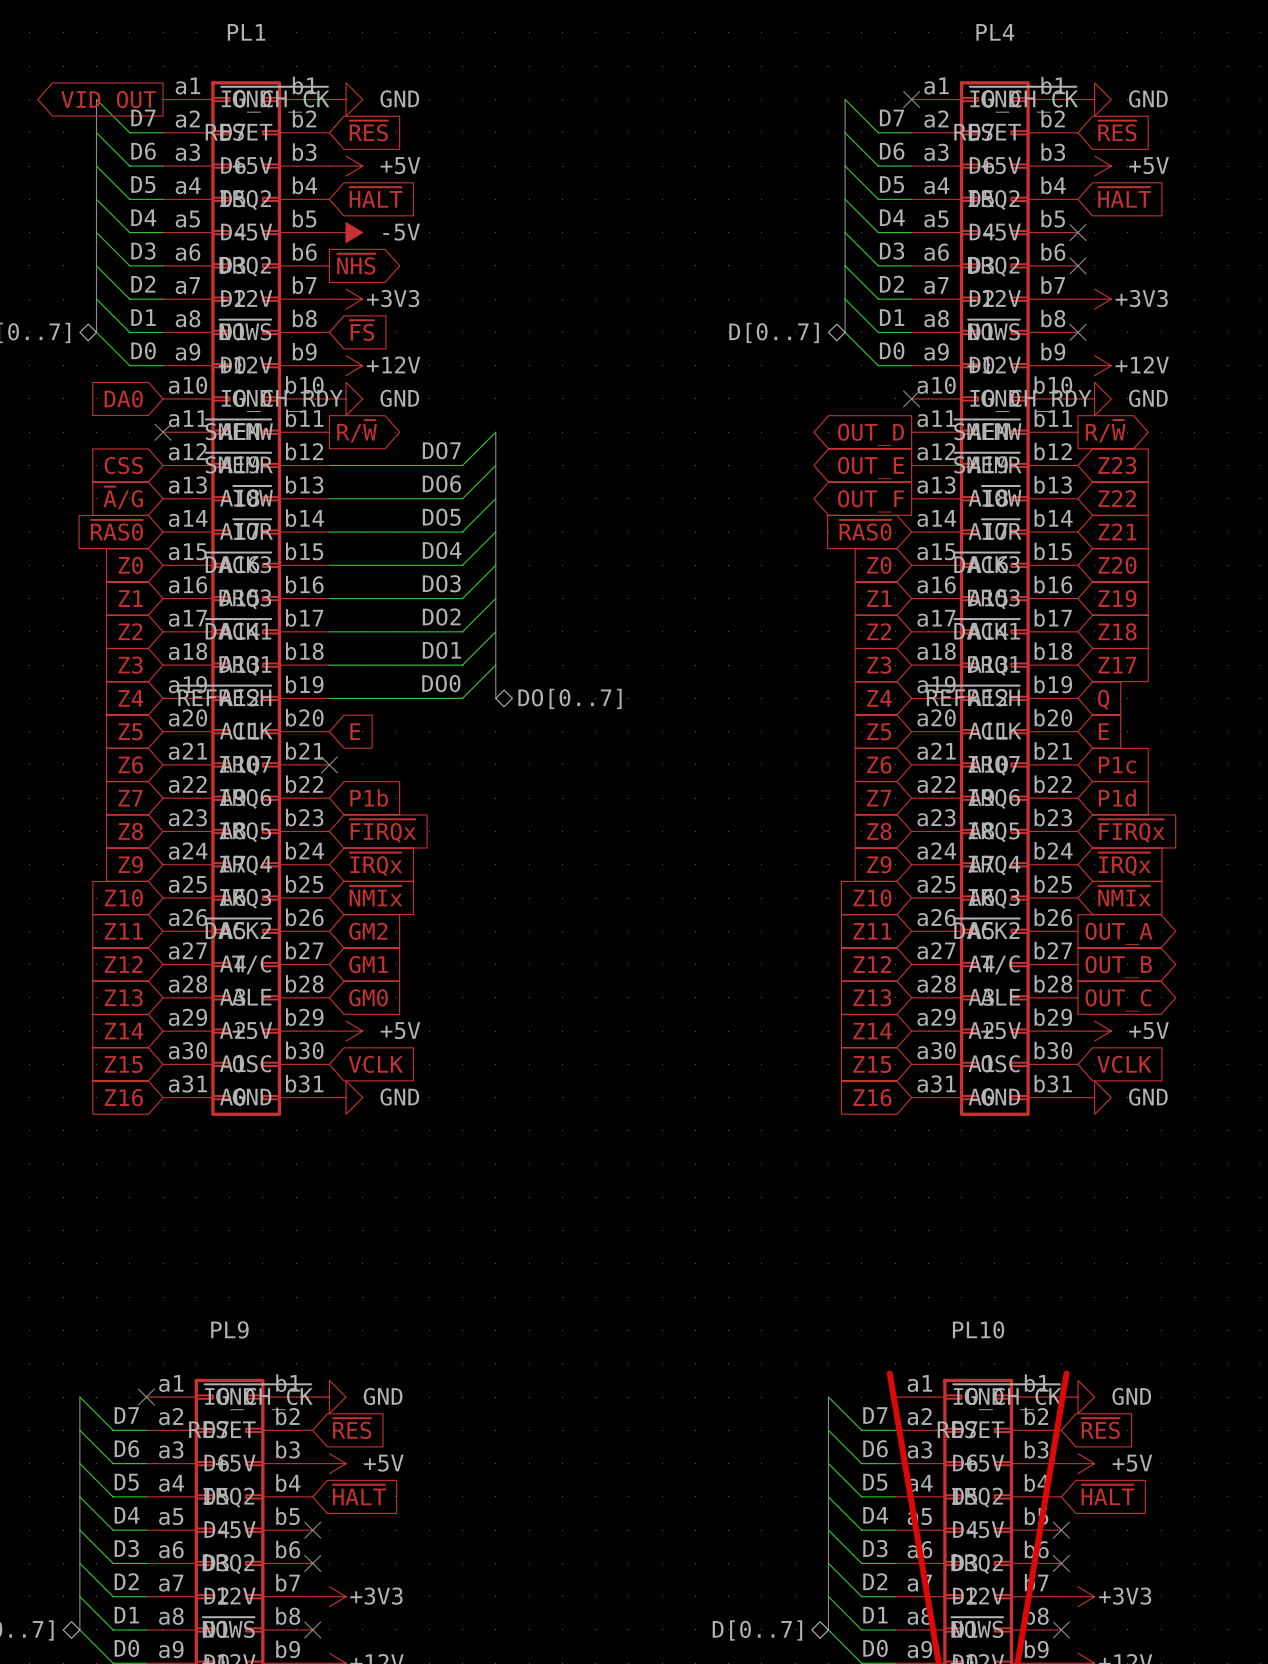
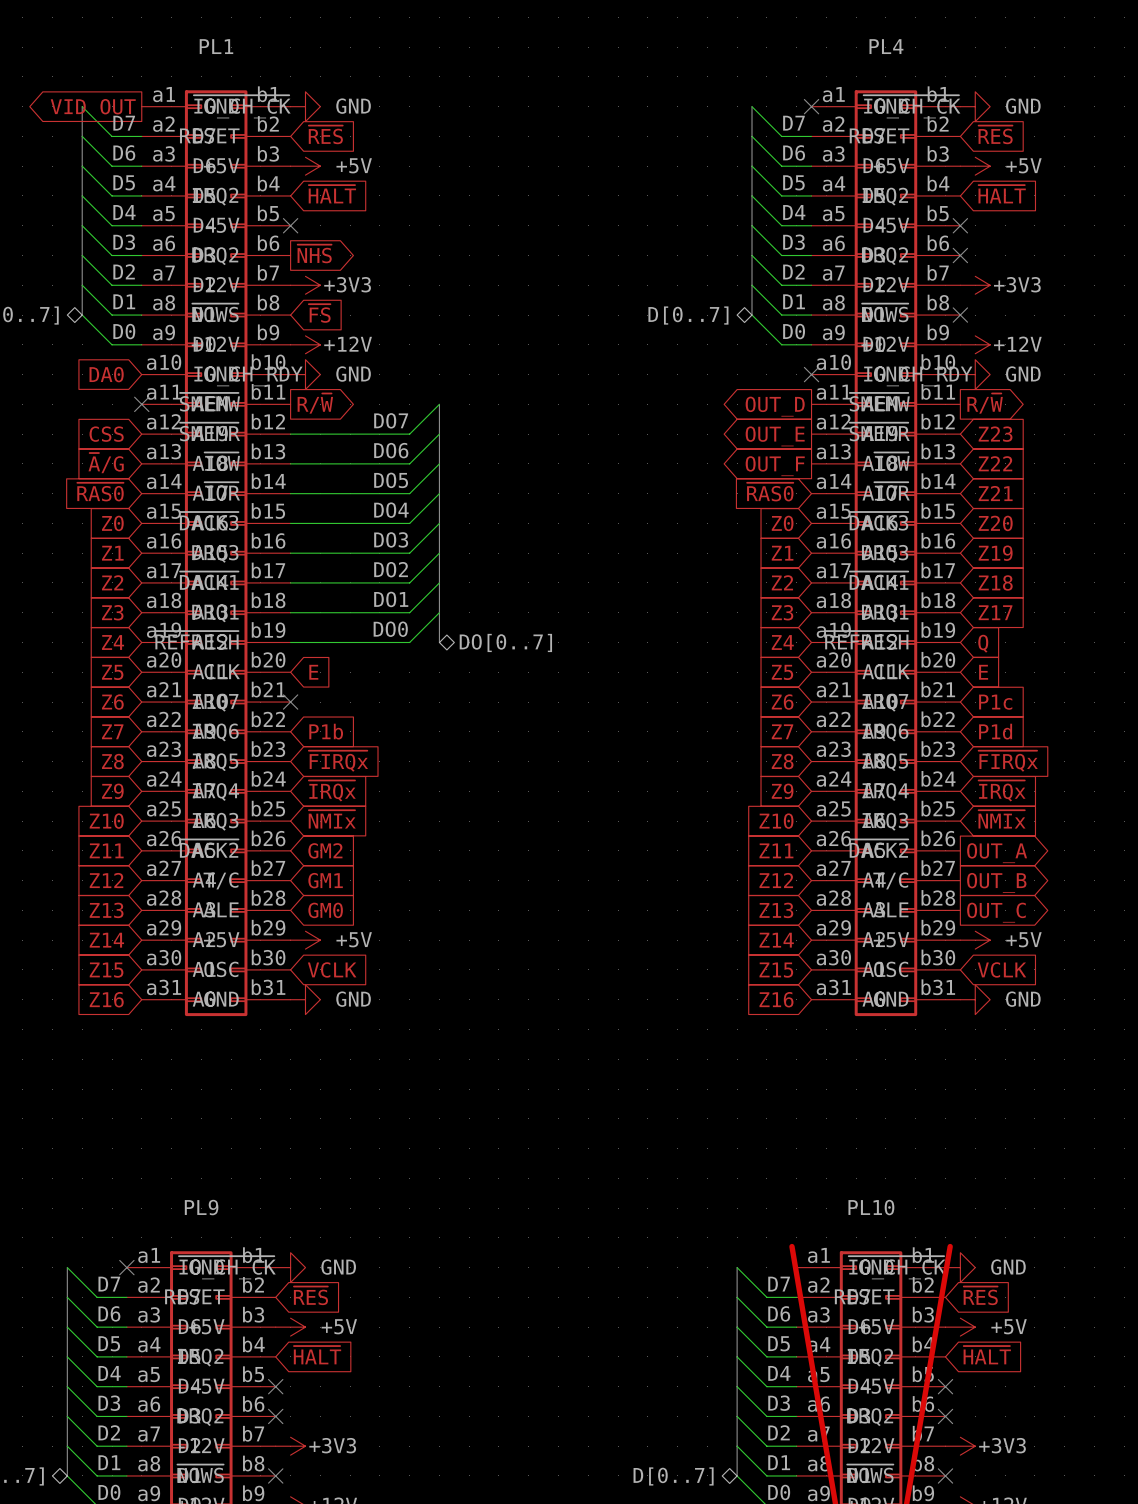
no-connect mark: none -> (290, 225)
power symbol: -5V (346, 232) -> none

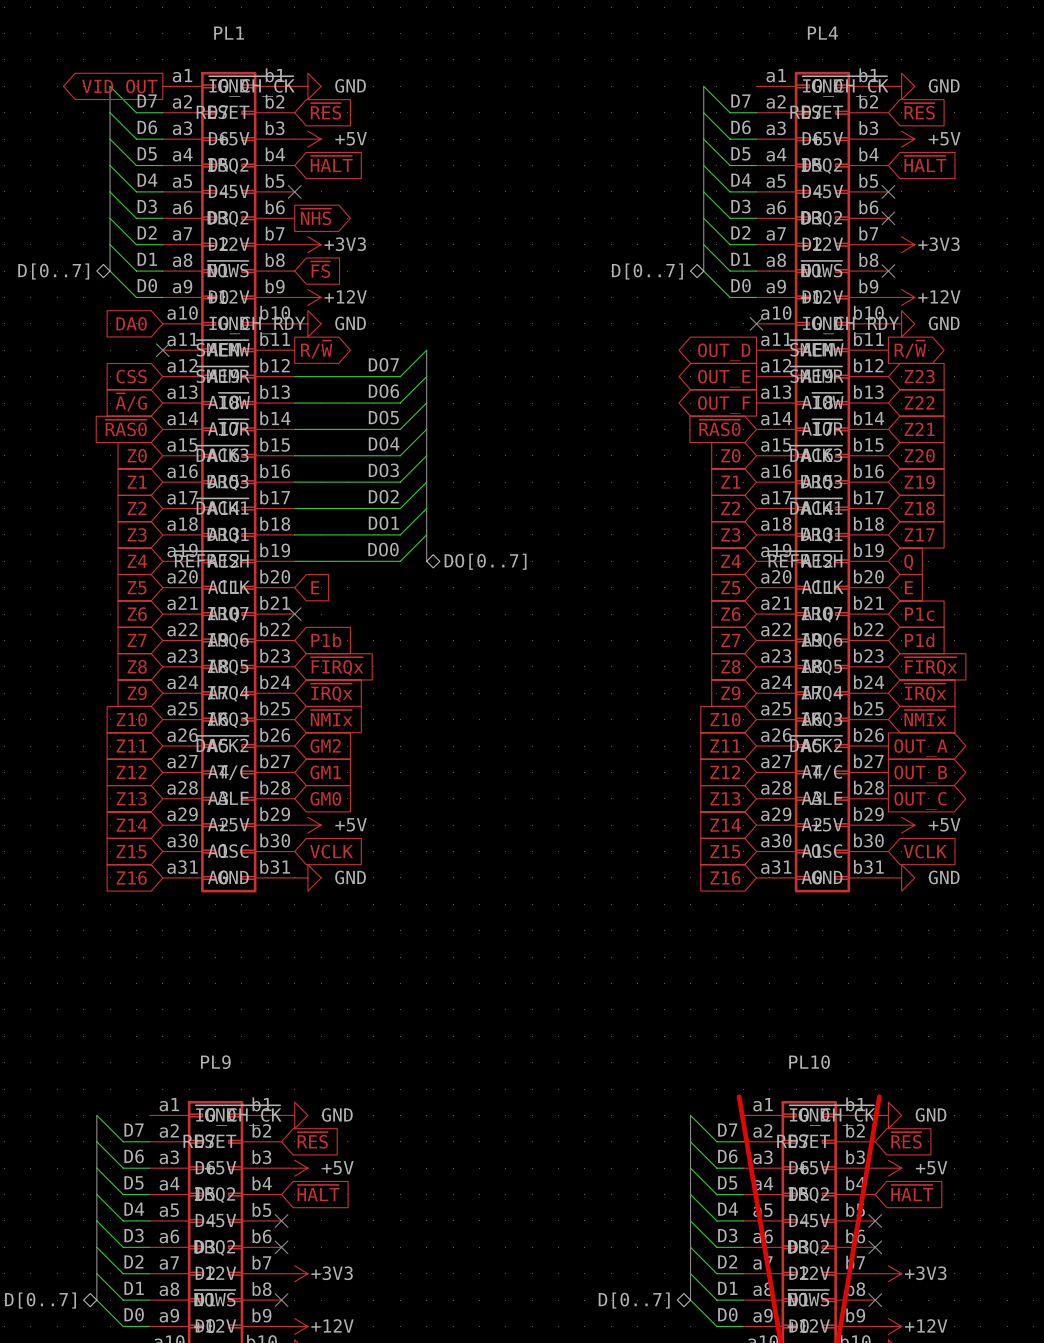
no-connect mark: (811, 106) -> none
no-connect mark: (126, 1267) -> none

